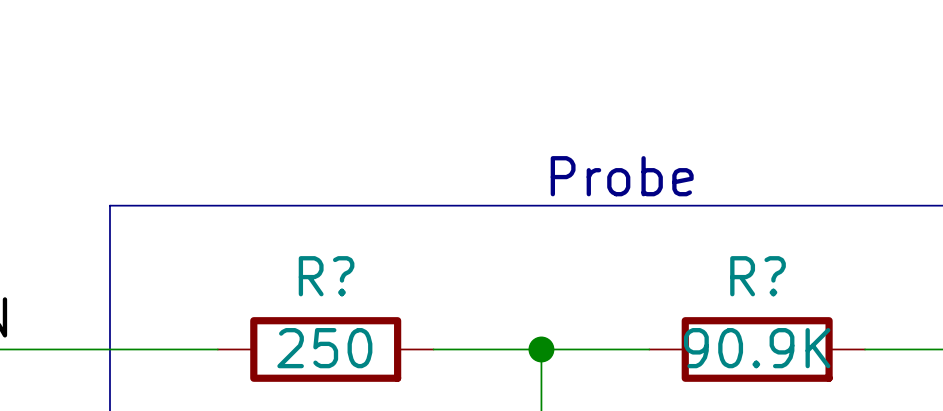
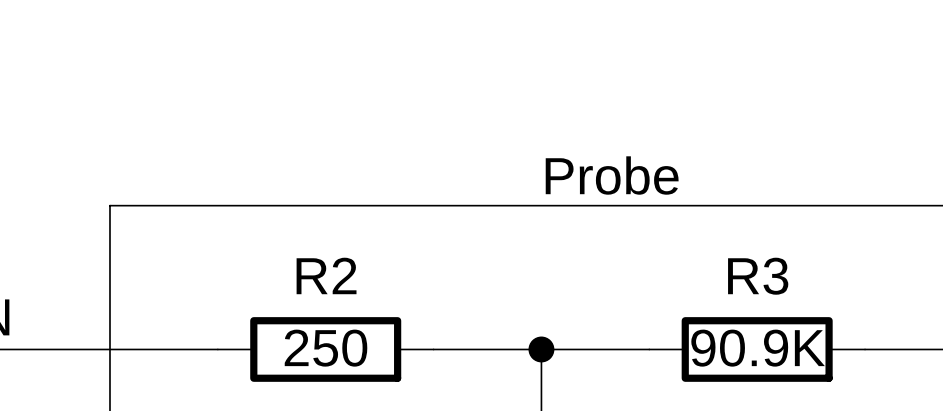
R? name: R? (326, 276) -> R2 (326, 275)
R? name: R? (758, 276) -> R3 (758, 276)

